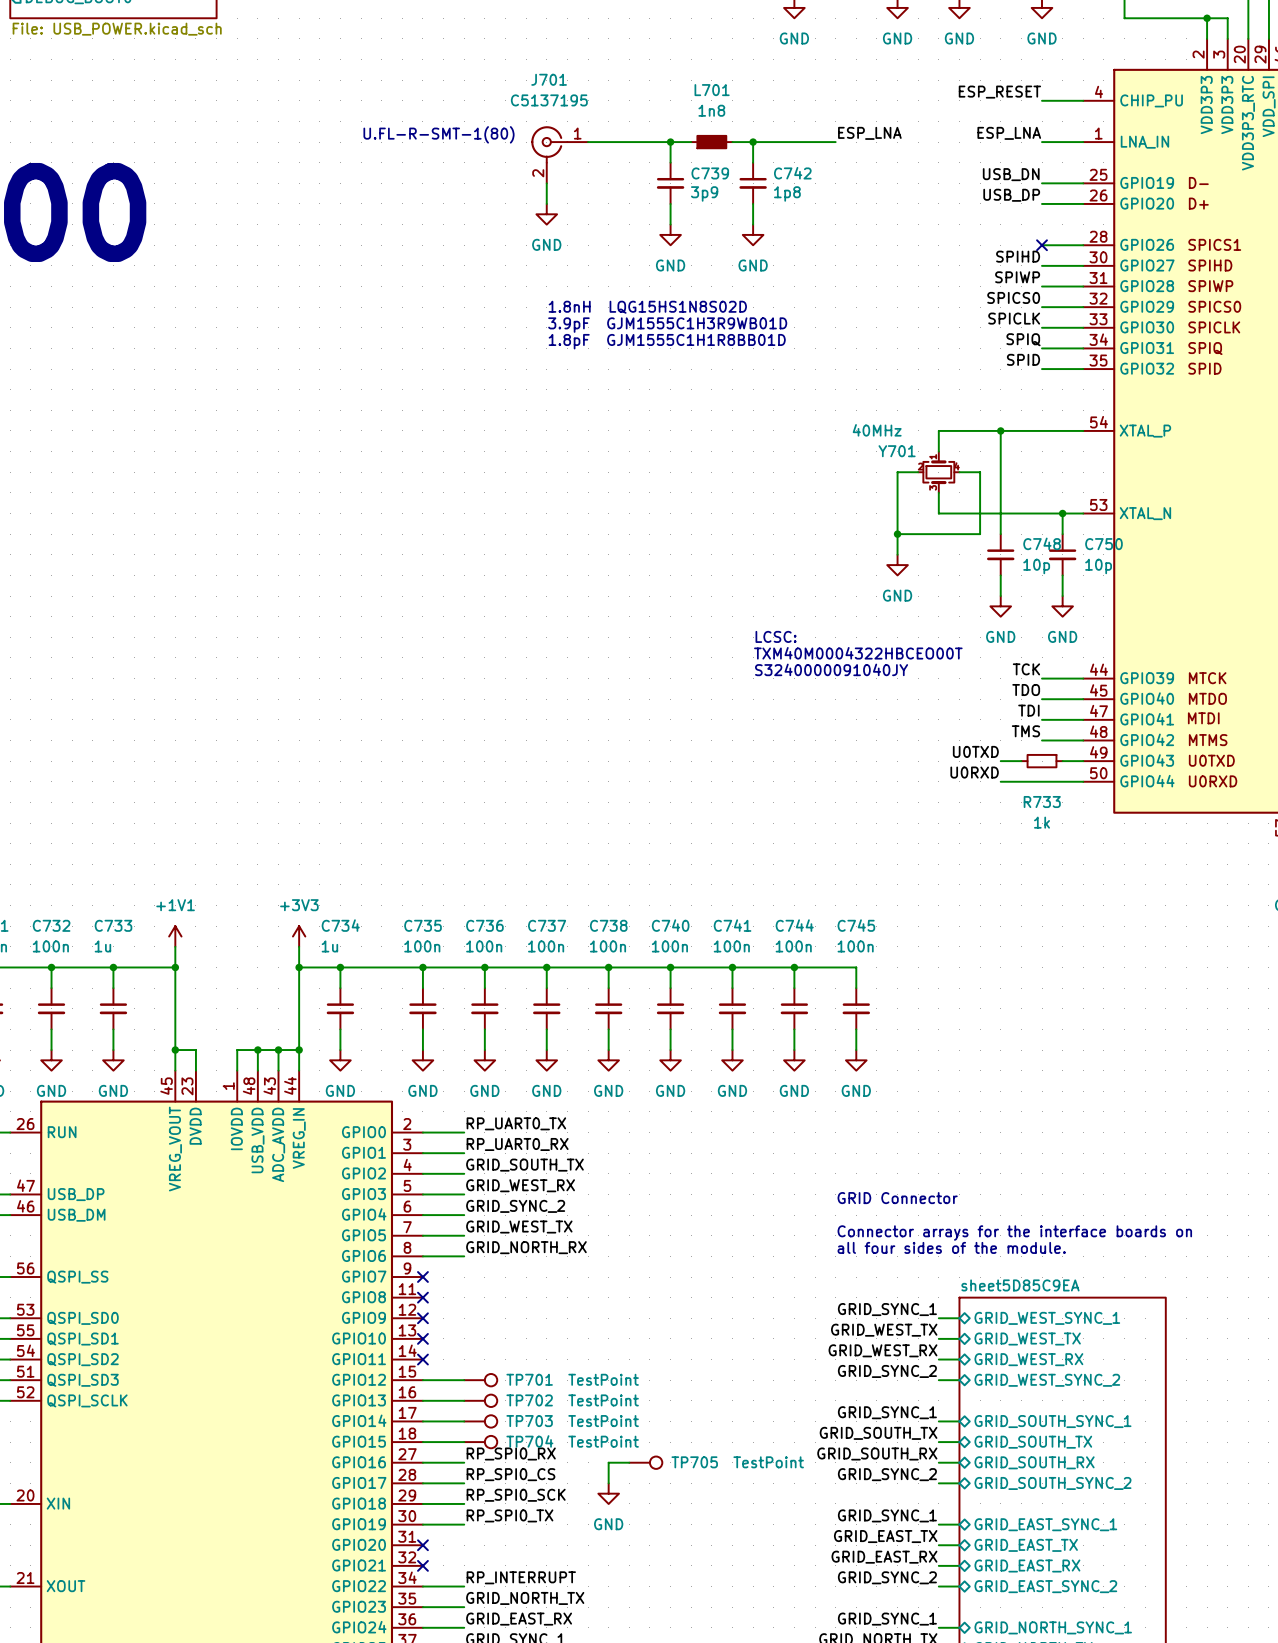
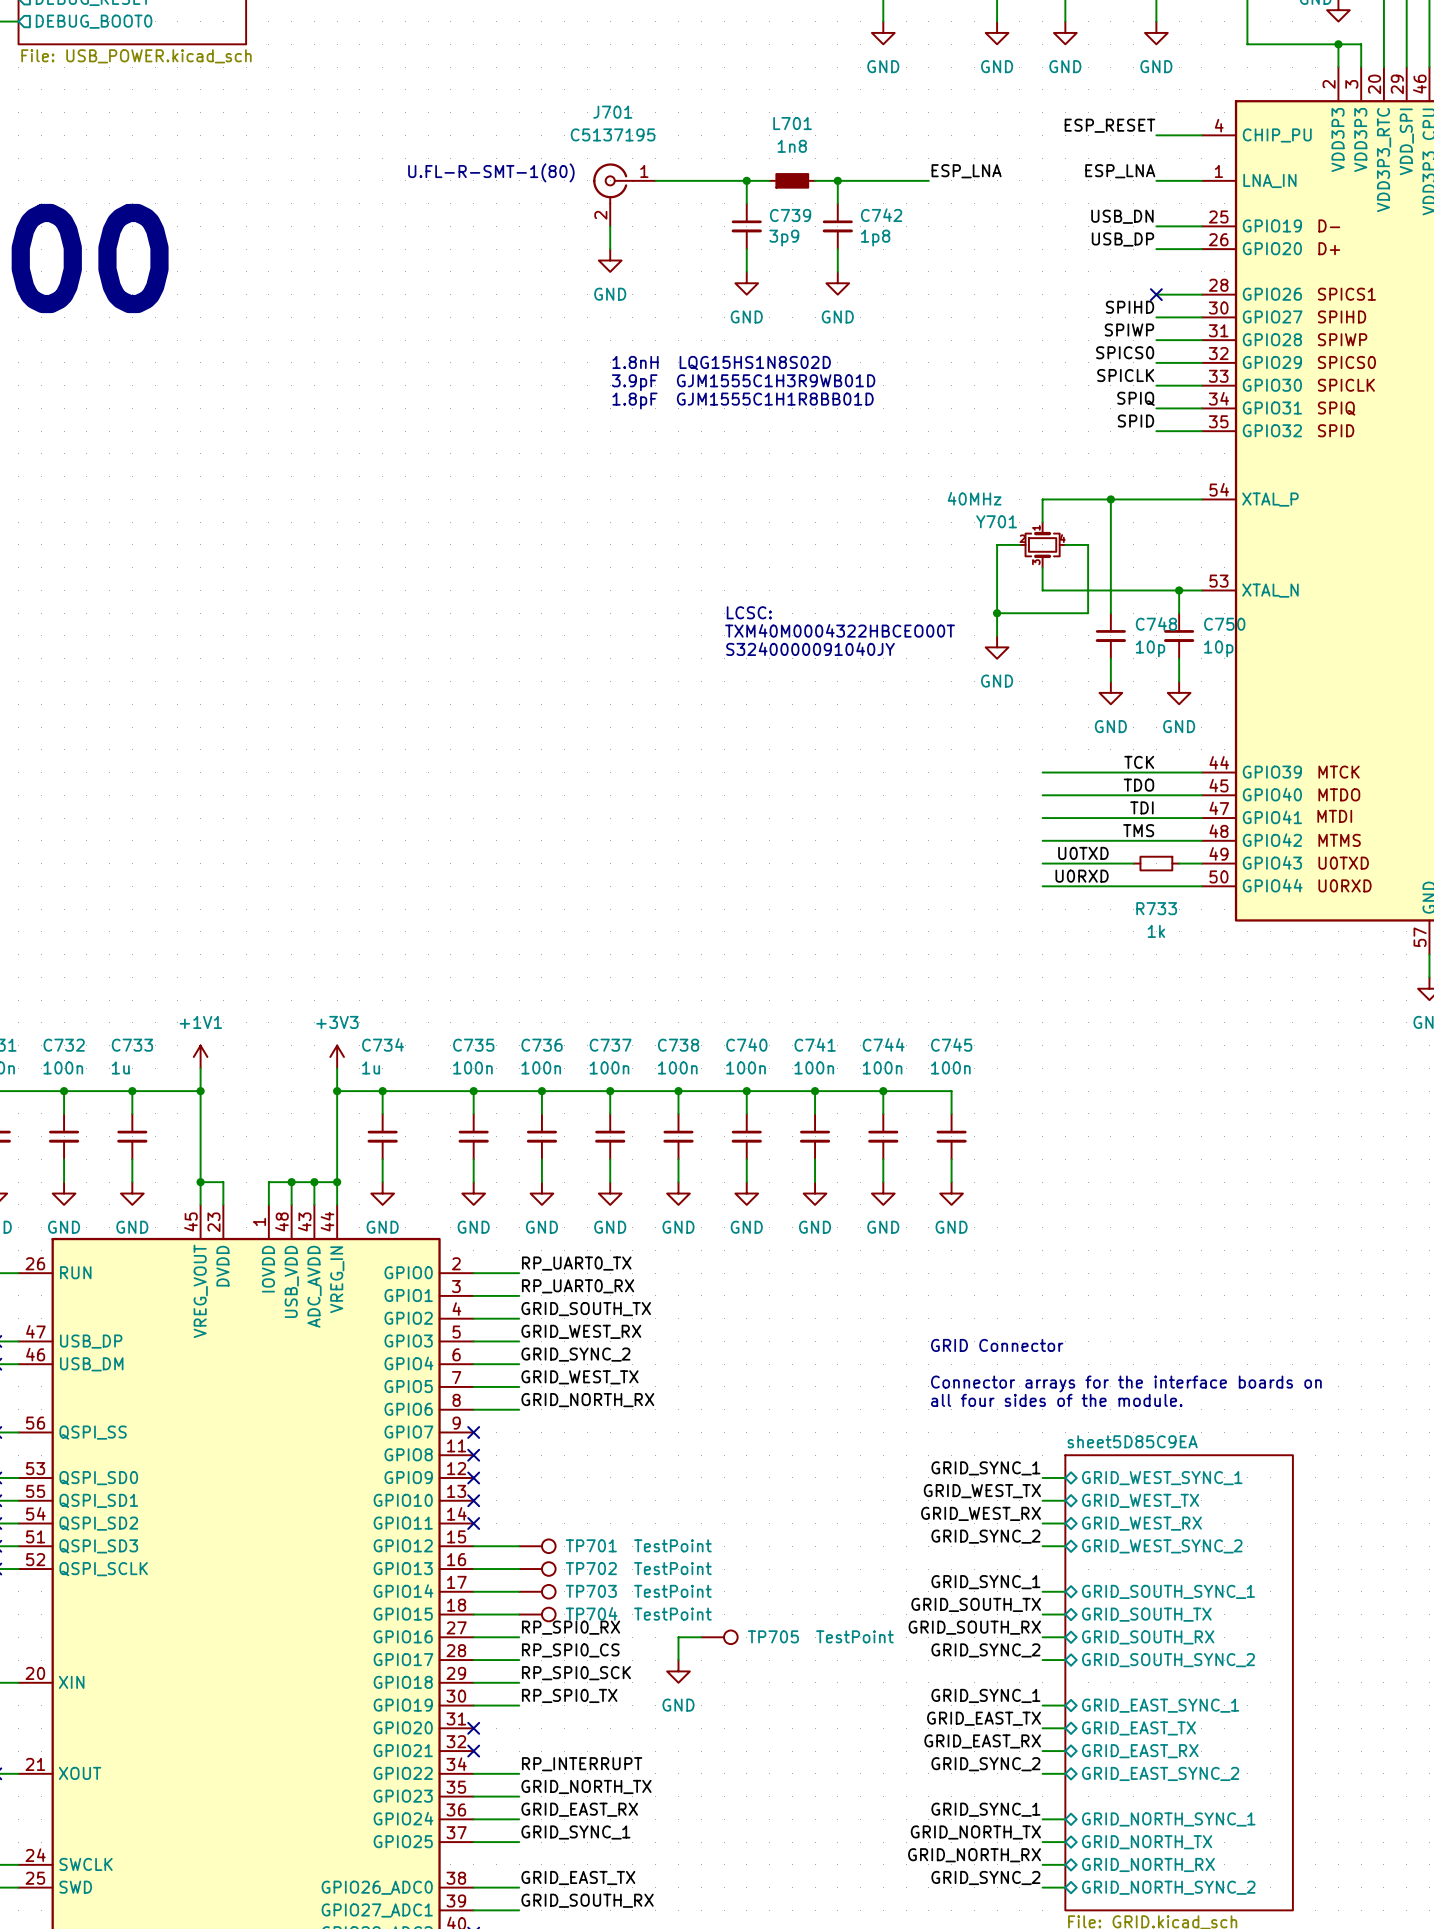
text position: LCSC: (776, 636) -> LCSC: (749, 612)
text position: TXM40M0004322HBCEO00T (858, 653) -> TXM40M0004322HBCEO00T (840, 630)
text position: S3240000091040JY (831, 669) -> S3240000091040JY (810, 649)
wire: none -> (1042, 772) (1156, 772)
wire: none -> (1042, 795) (1156, 795)
wire: none -> (1042, 818) (1156, 818)
wire: none -> (1042, 840) (1156, 840)
wire: none -> (1042, 863) (1110, 863)
wire: none -> (1042, 886) (1110, 886)

